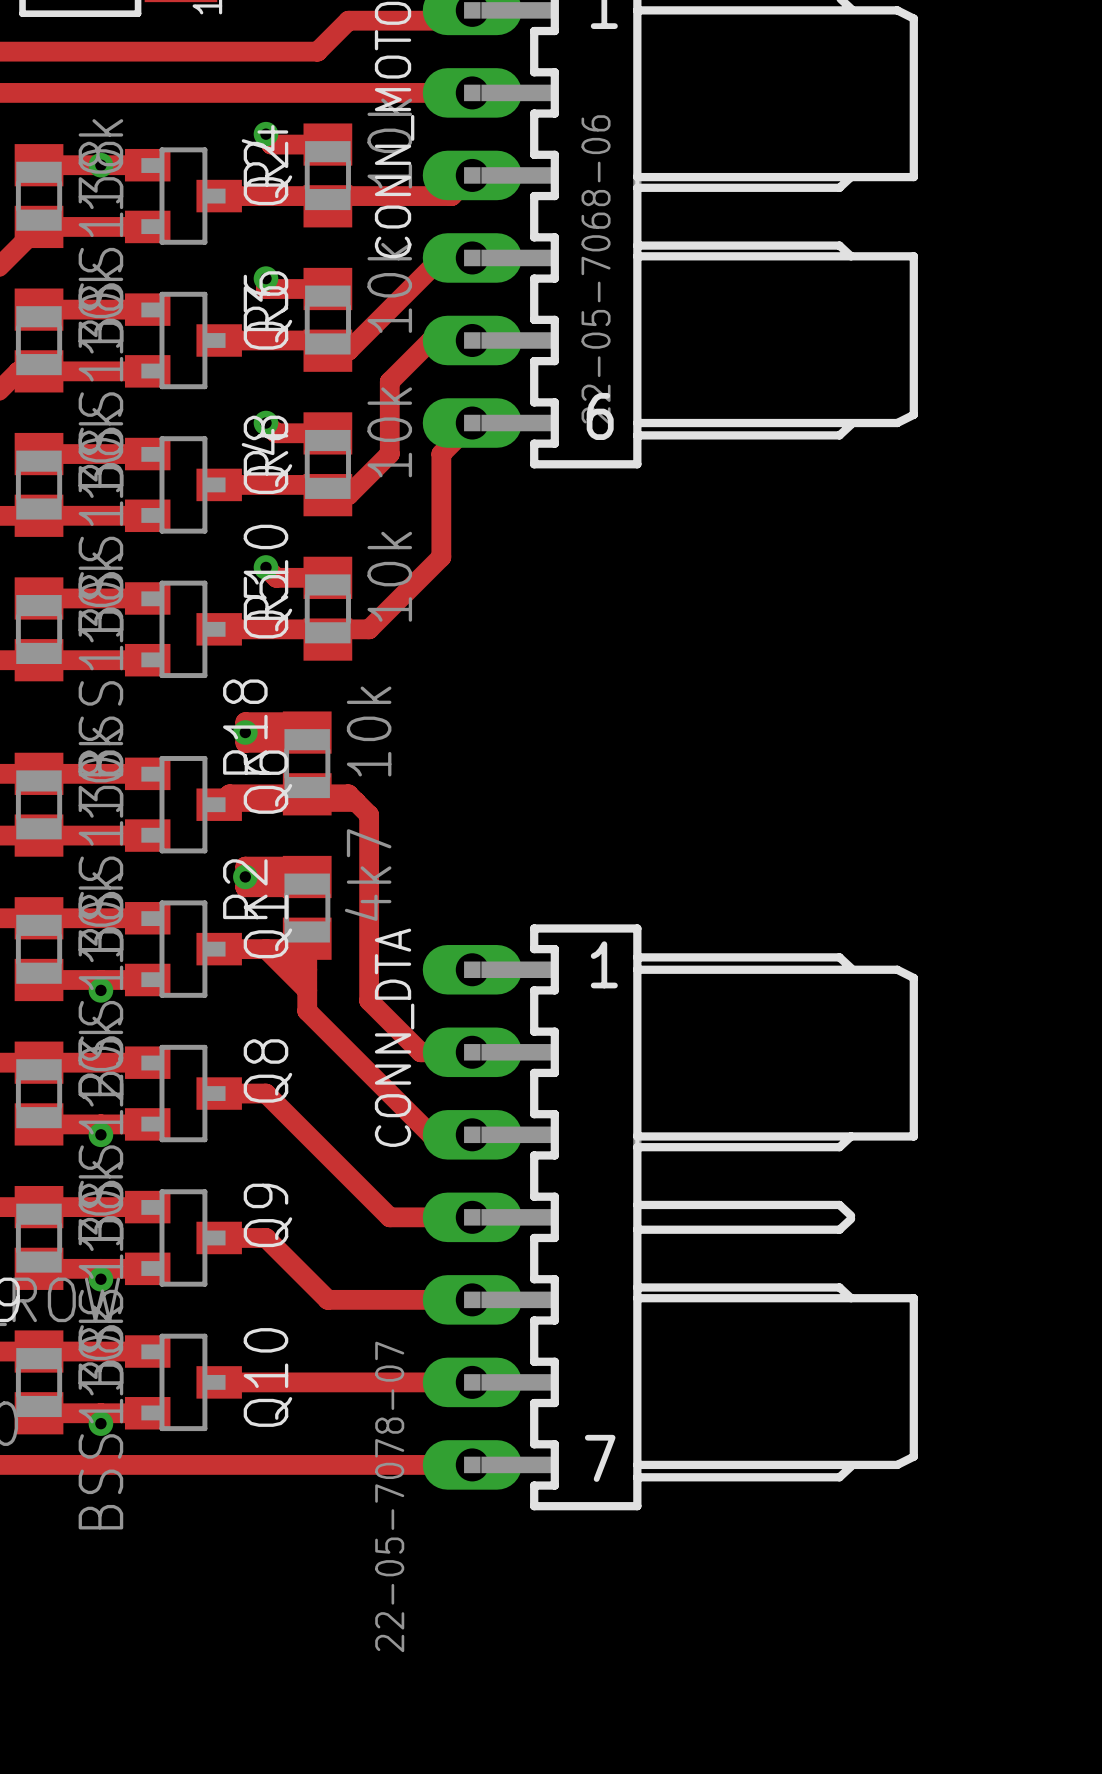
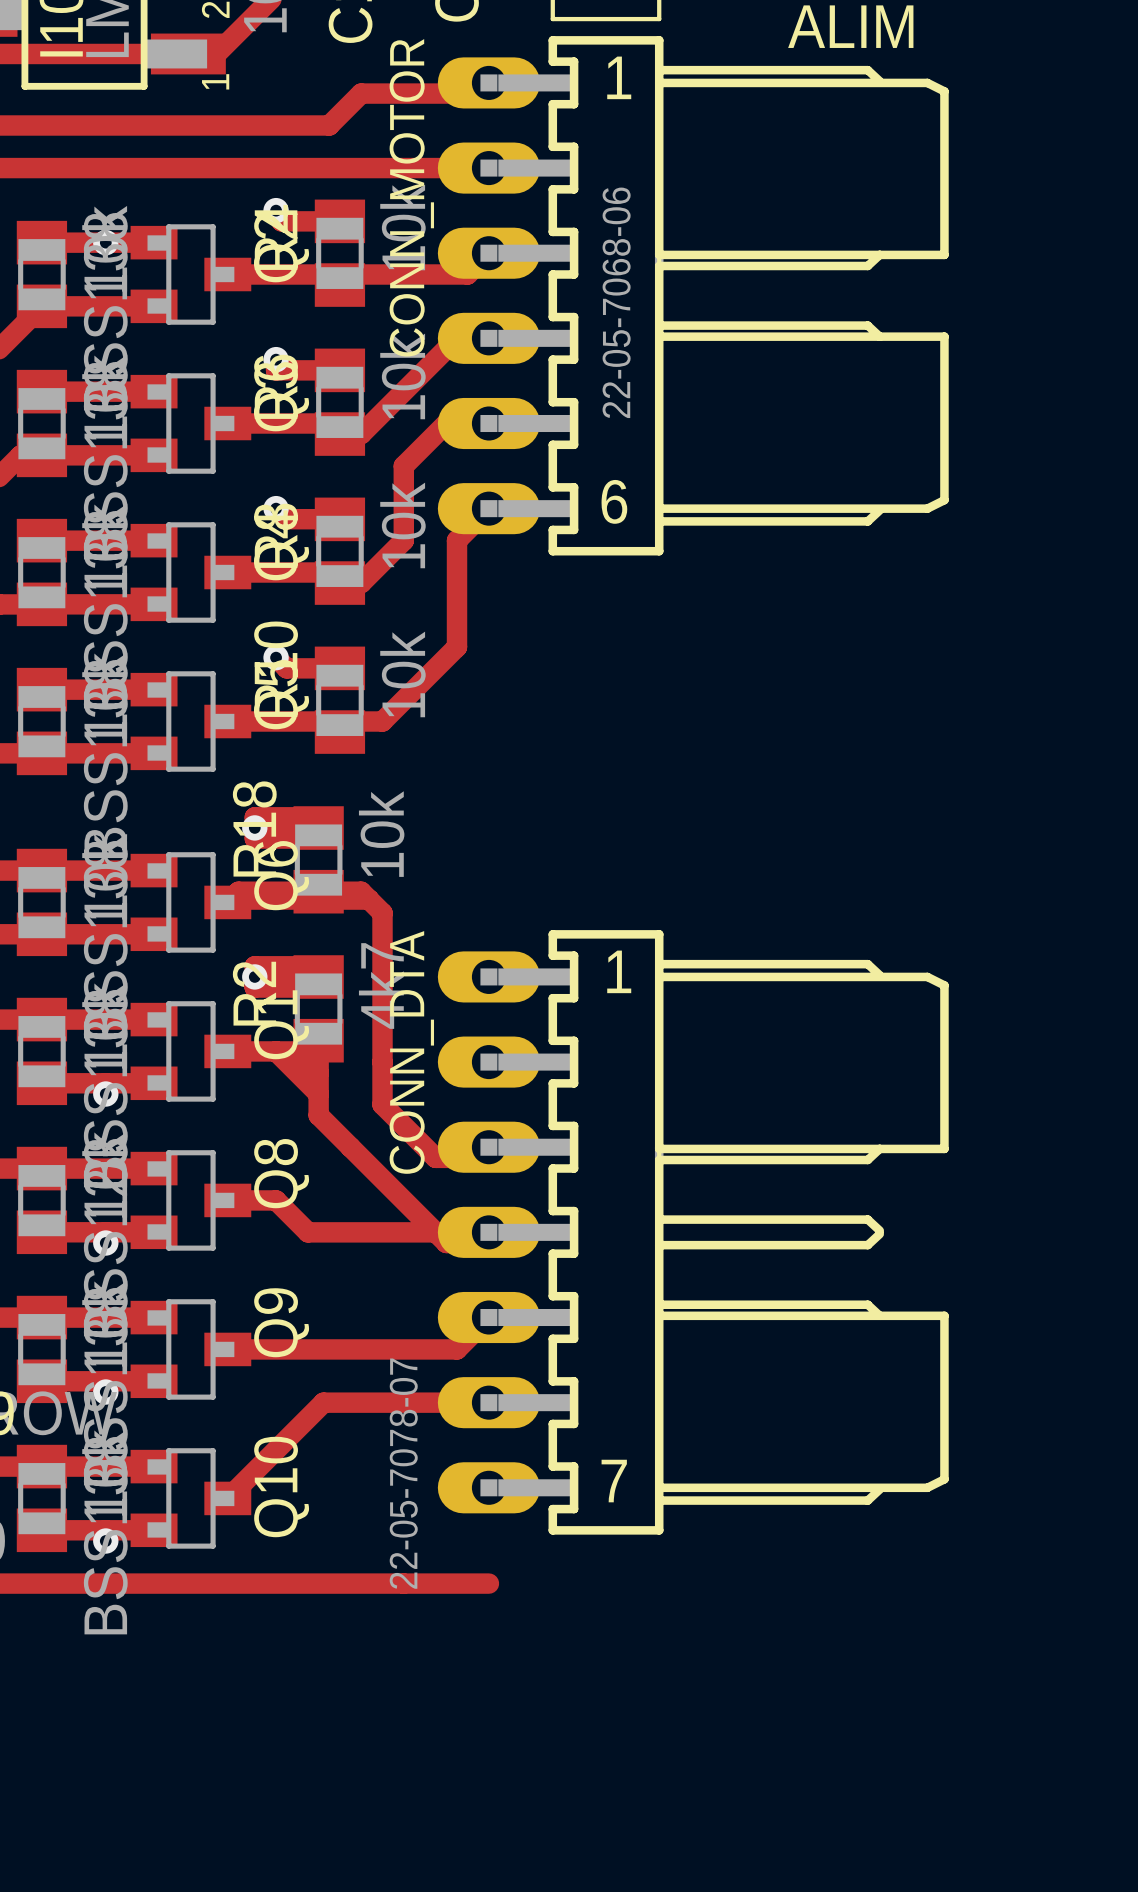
track: (296, 1124) (389, 1217) (472, 1217) -> (308, 1232) (488, 1232)
CONN_DTA position: (670, 1217) -> (693, 1232)
track: (265, 1237) (327, 1299) (472, 1299) -> (276, 1349) (457, 1349) (488, 1317)
track: (219, 1382) (472, 1382) -> (227, 1498) (323, 1402) (488, 1402)

